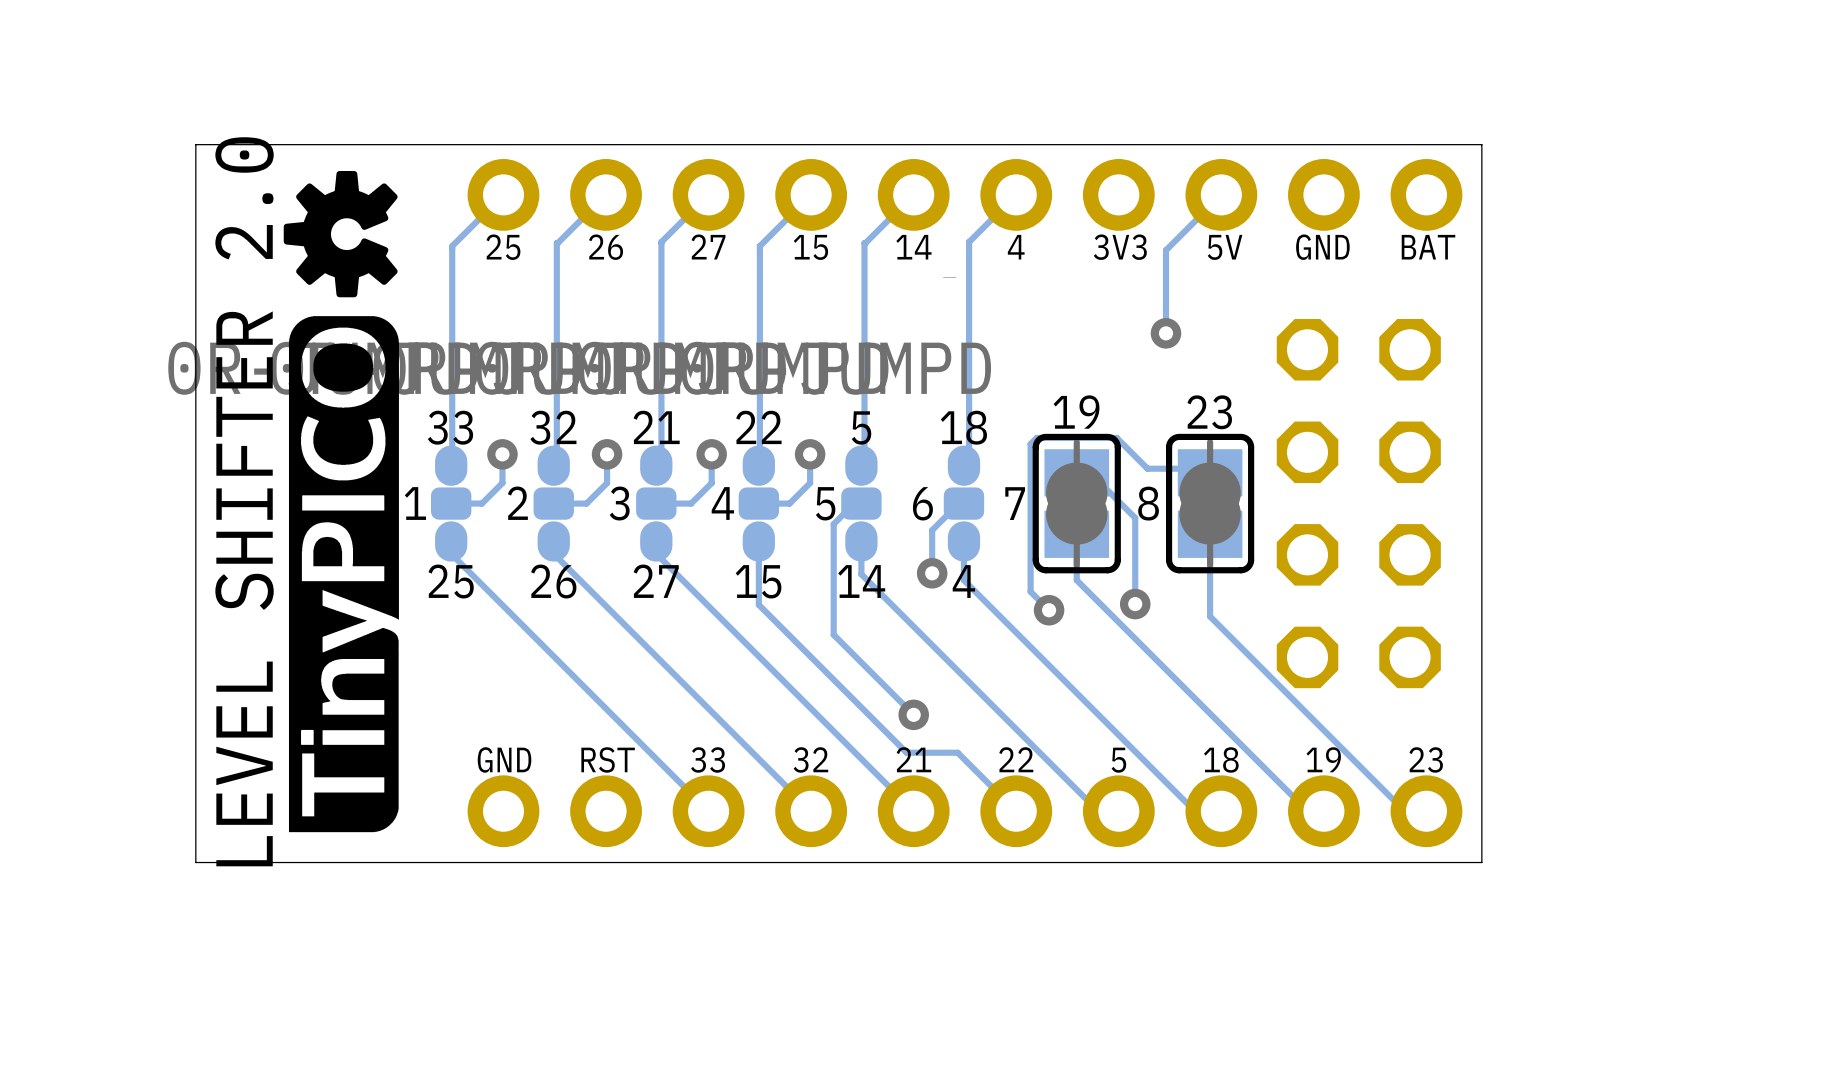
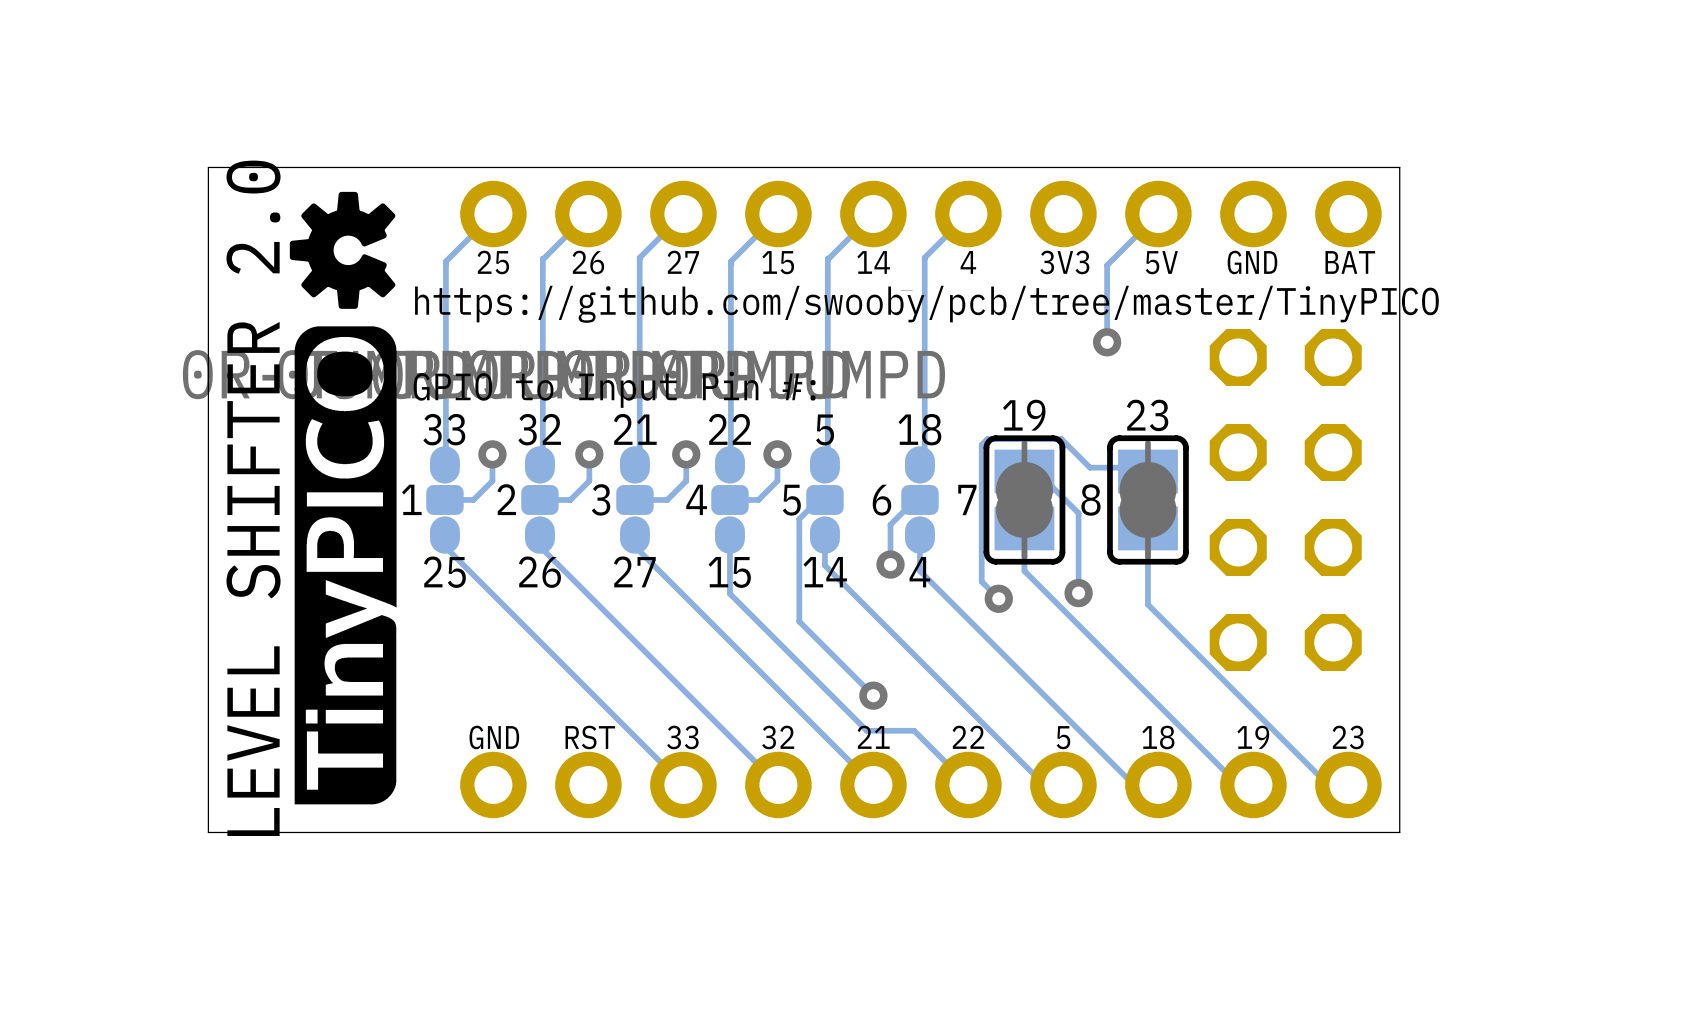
text: none -> https://github.com/swooby/pcb/tree/master/TinyPICO (926, 304)
text: none -> GPIO to Input Pin #: (614, 389)

